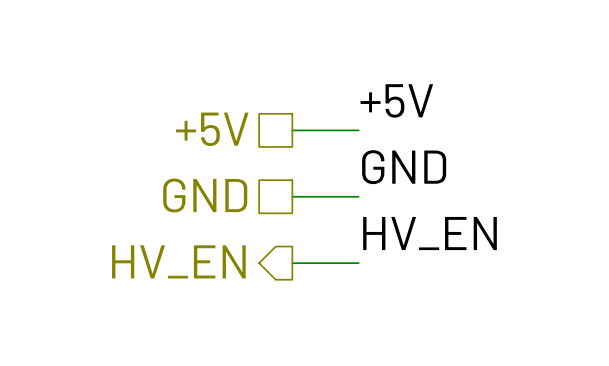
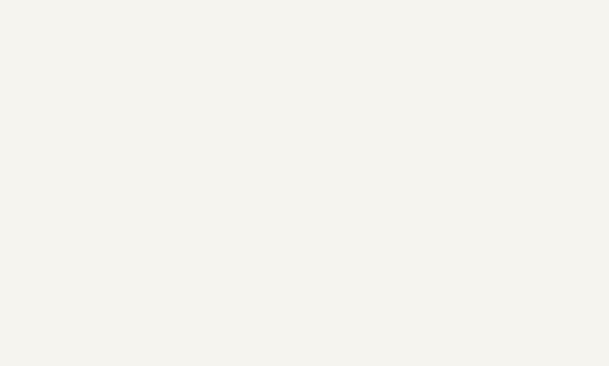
label: +5V (396, 100) -> none
hierarchical label: +5V (212, 129) -> none
wire: (292, 130) (358, 130) -> none
label: GND (404, 167) -> none
hierarchical label: GND (205, 195) -> none
wire: (292, 196) (358, 196) -> none
label: HV_EN (430, 233) -> none
hierarchical label: HV_EN (178, 261) -> none
wire: (292, 263) (358, 263) -> none

